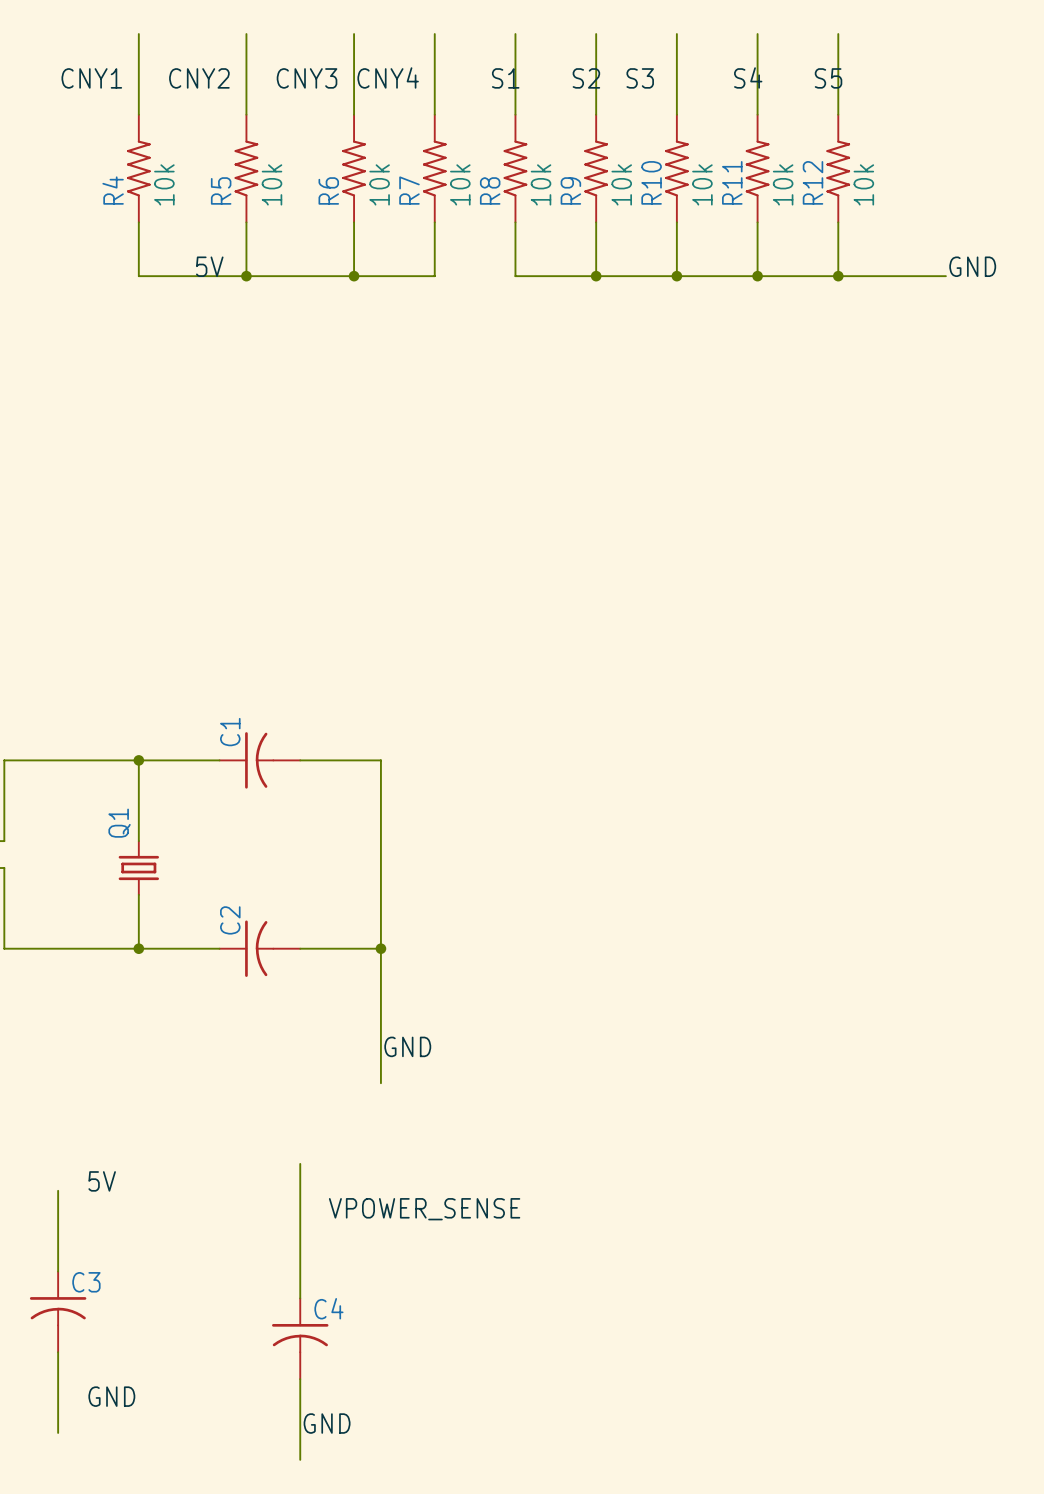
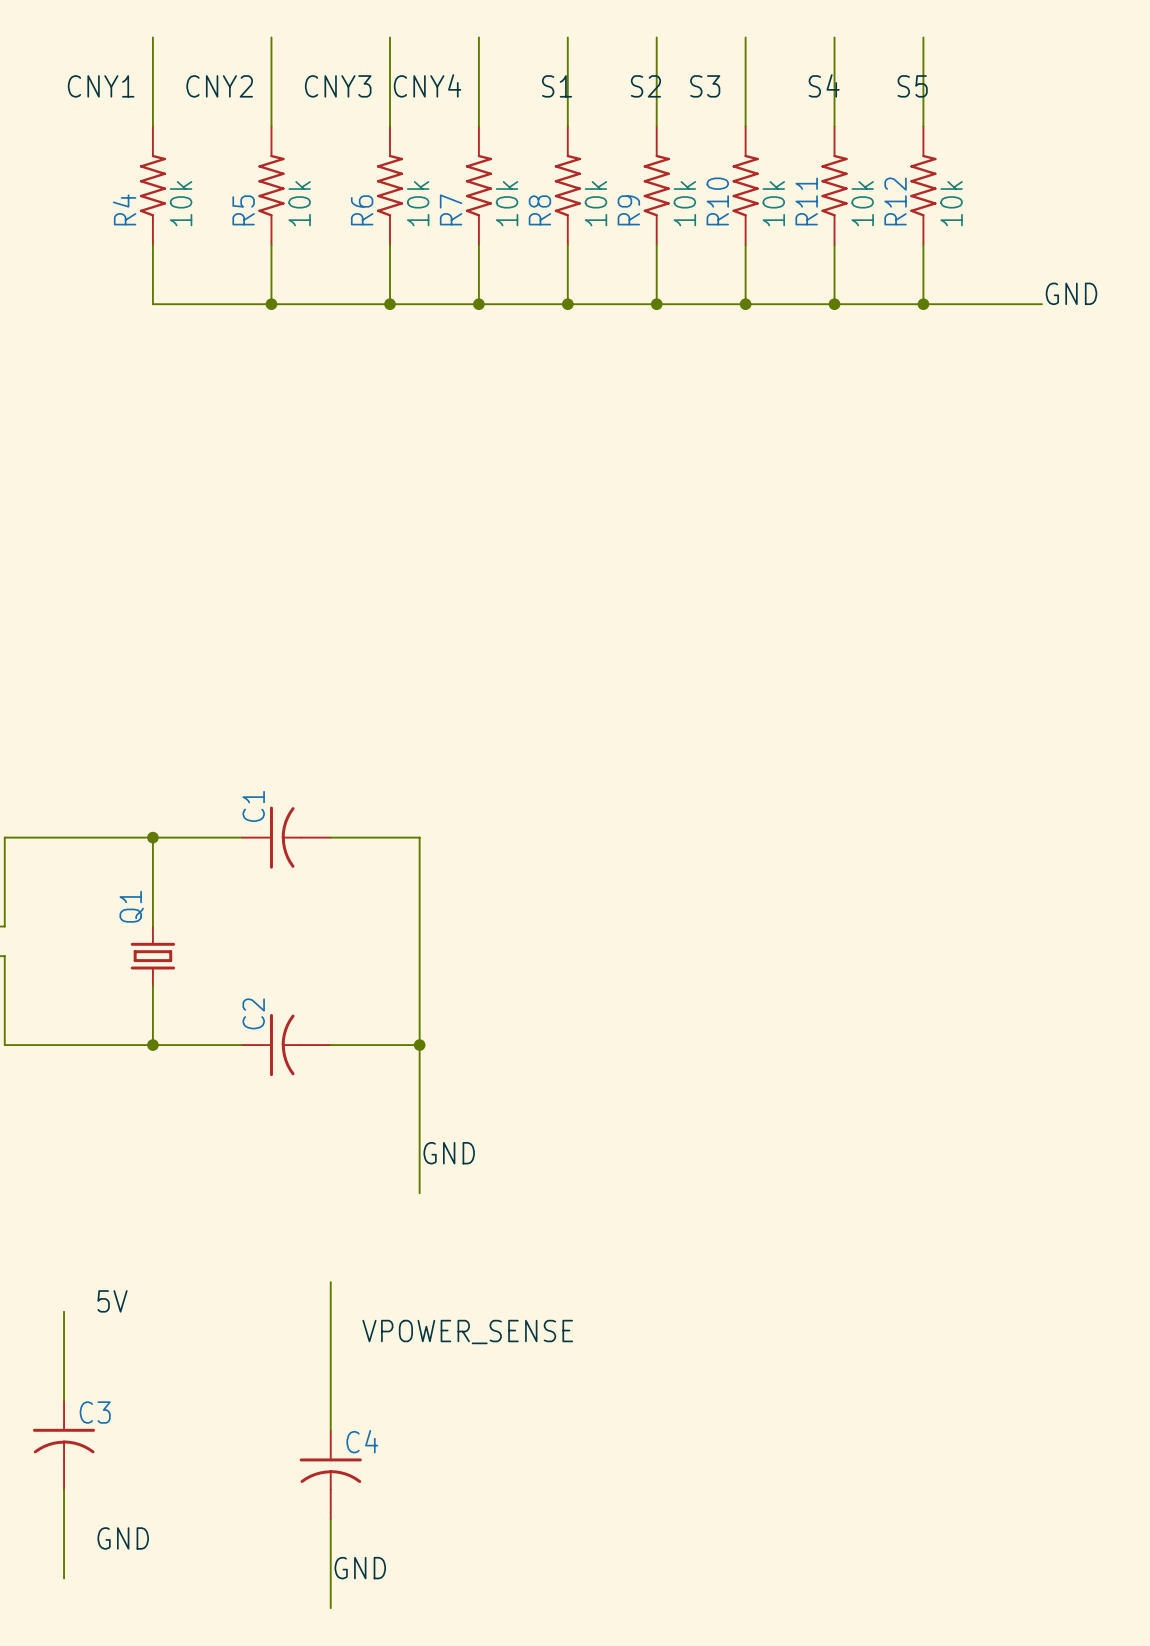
label: 5V (209, 266) -> none
wire: none -> (478, 304) (567, 304)
junction: none -> (478, 304)
junction: none -> (567, 304)

